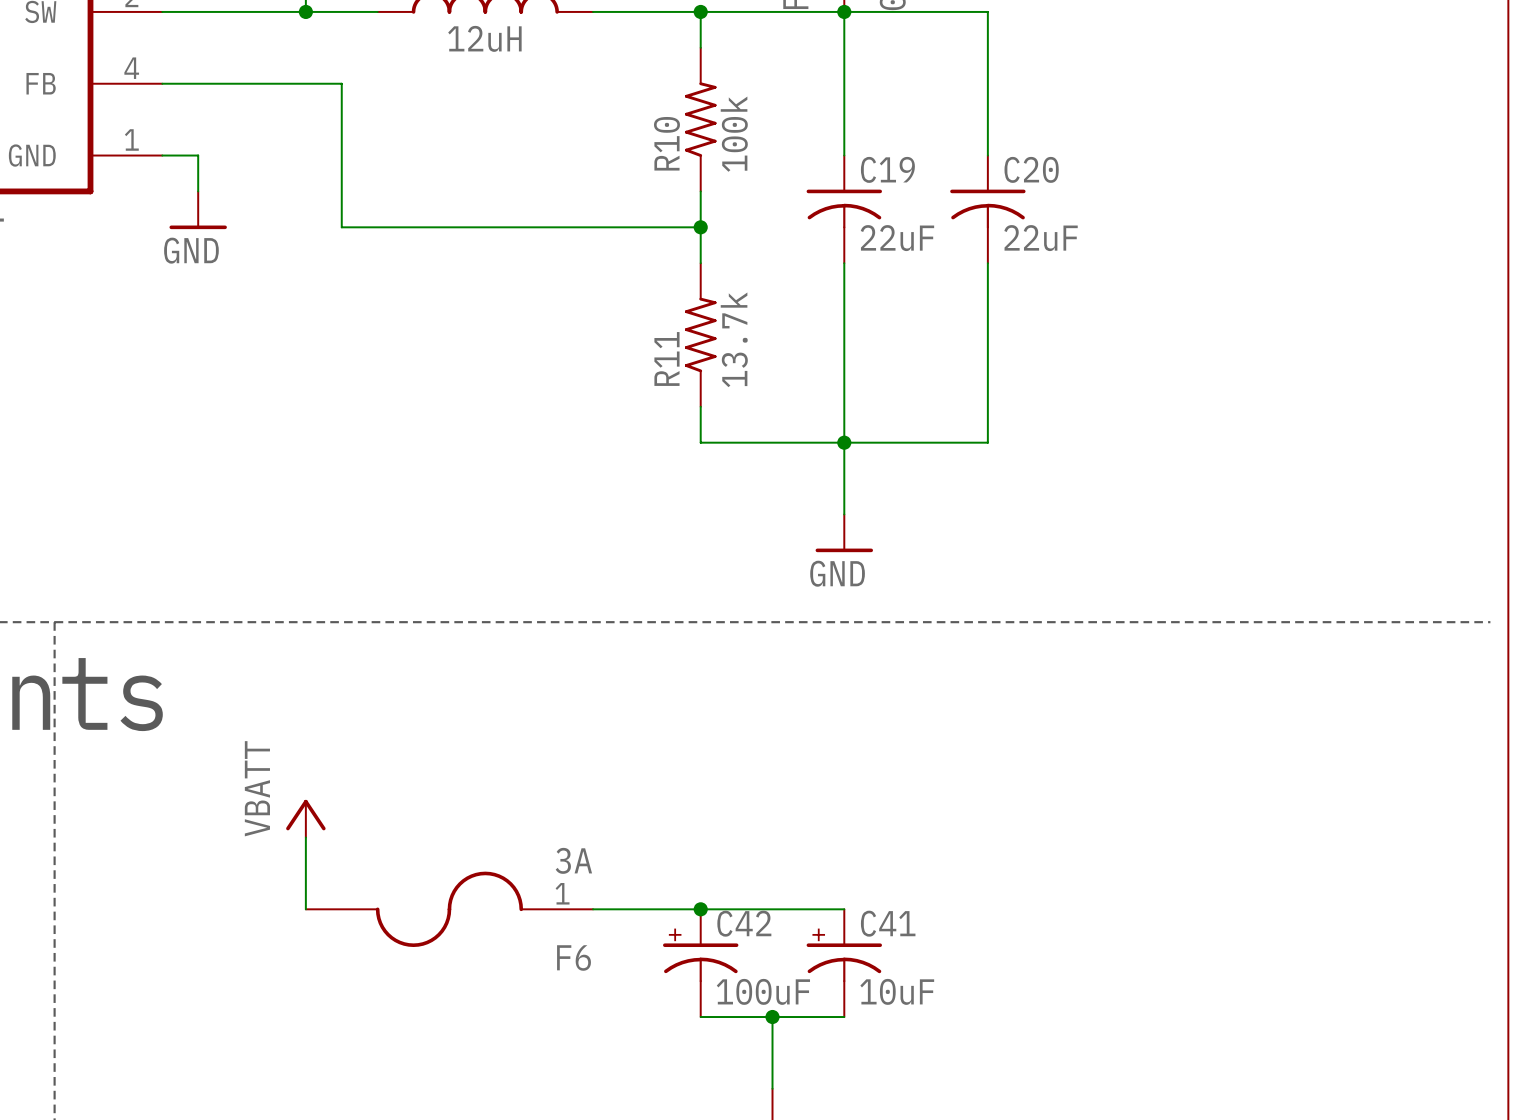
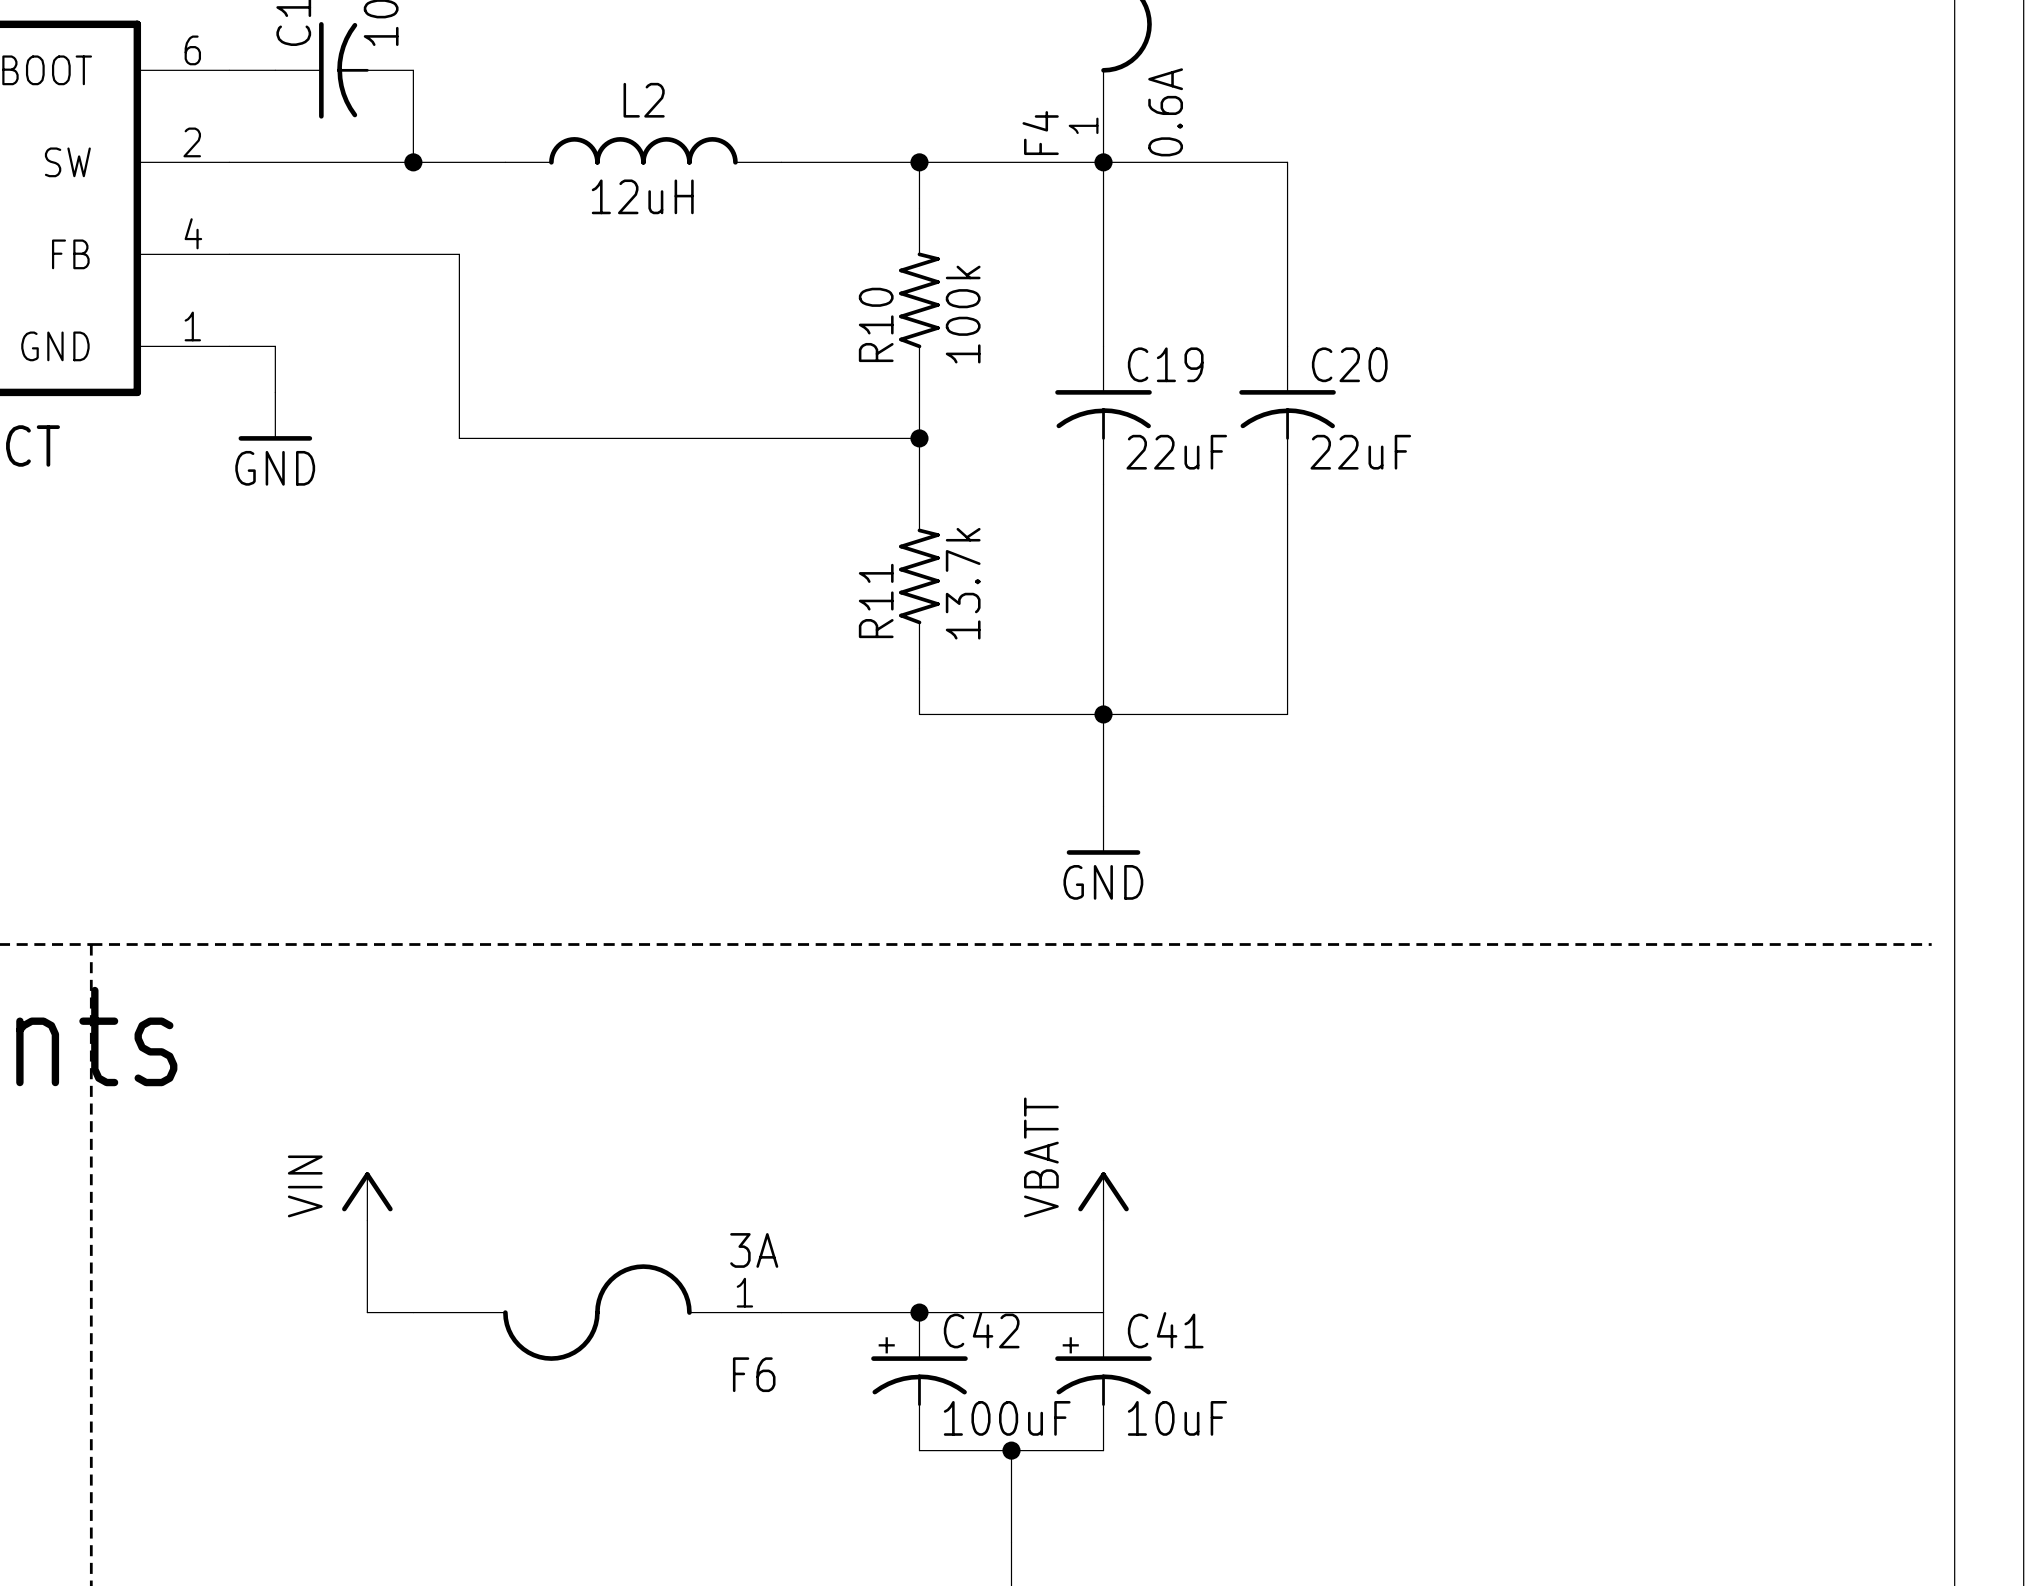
power symbol: none -> VIN (367, 1196)
power symbol: VBATT (305, 818) -> none
power symbol: none -> VBATT (1103, 1196)
wire: (305, 837) (305, 909) -> (367, 1220) (367, 1312) (413, 1312)
wire: none -> (1103, 1220) (1103, 1312)

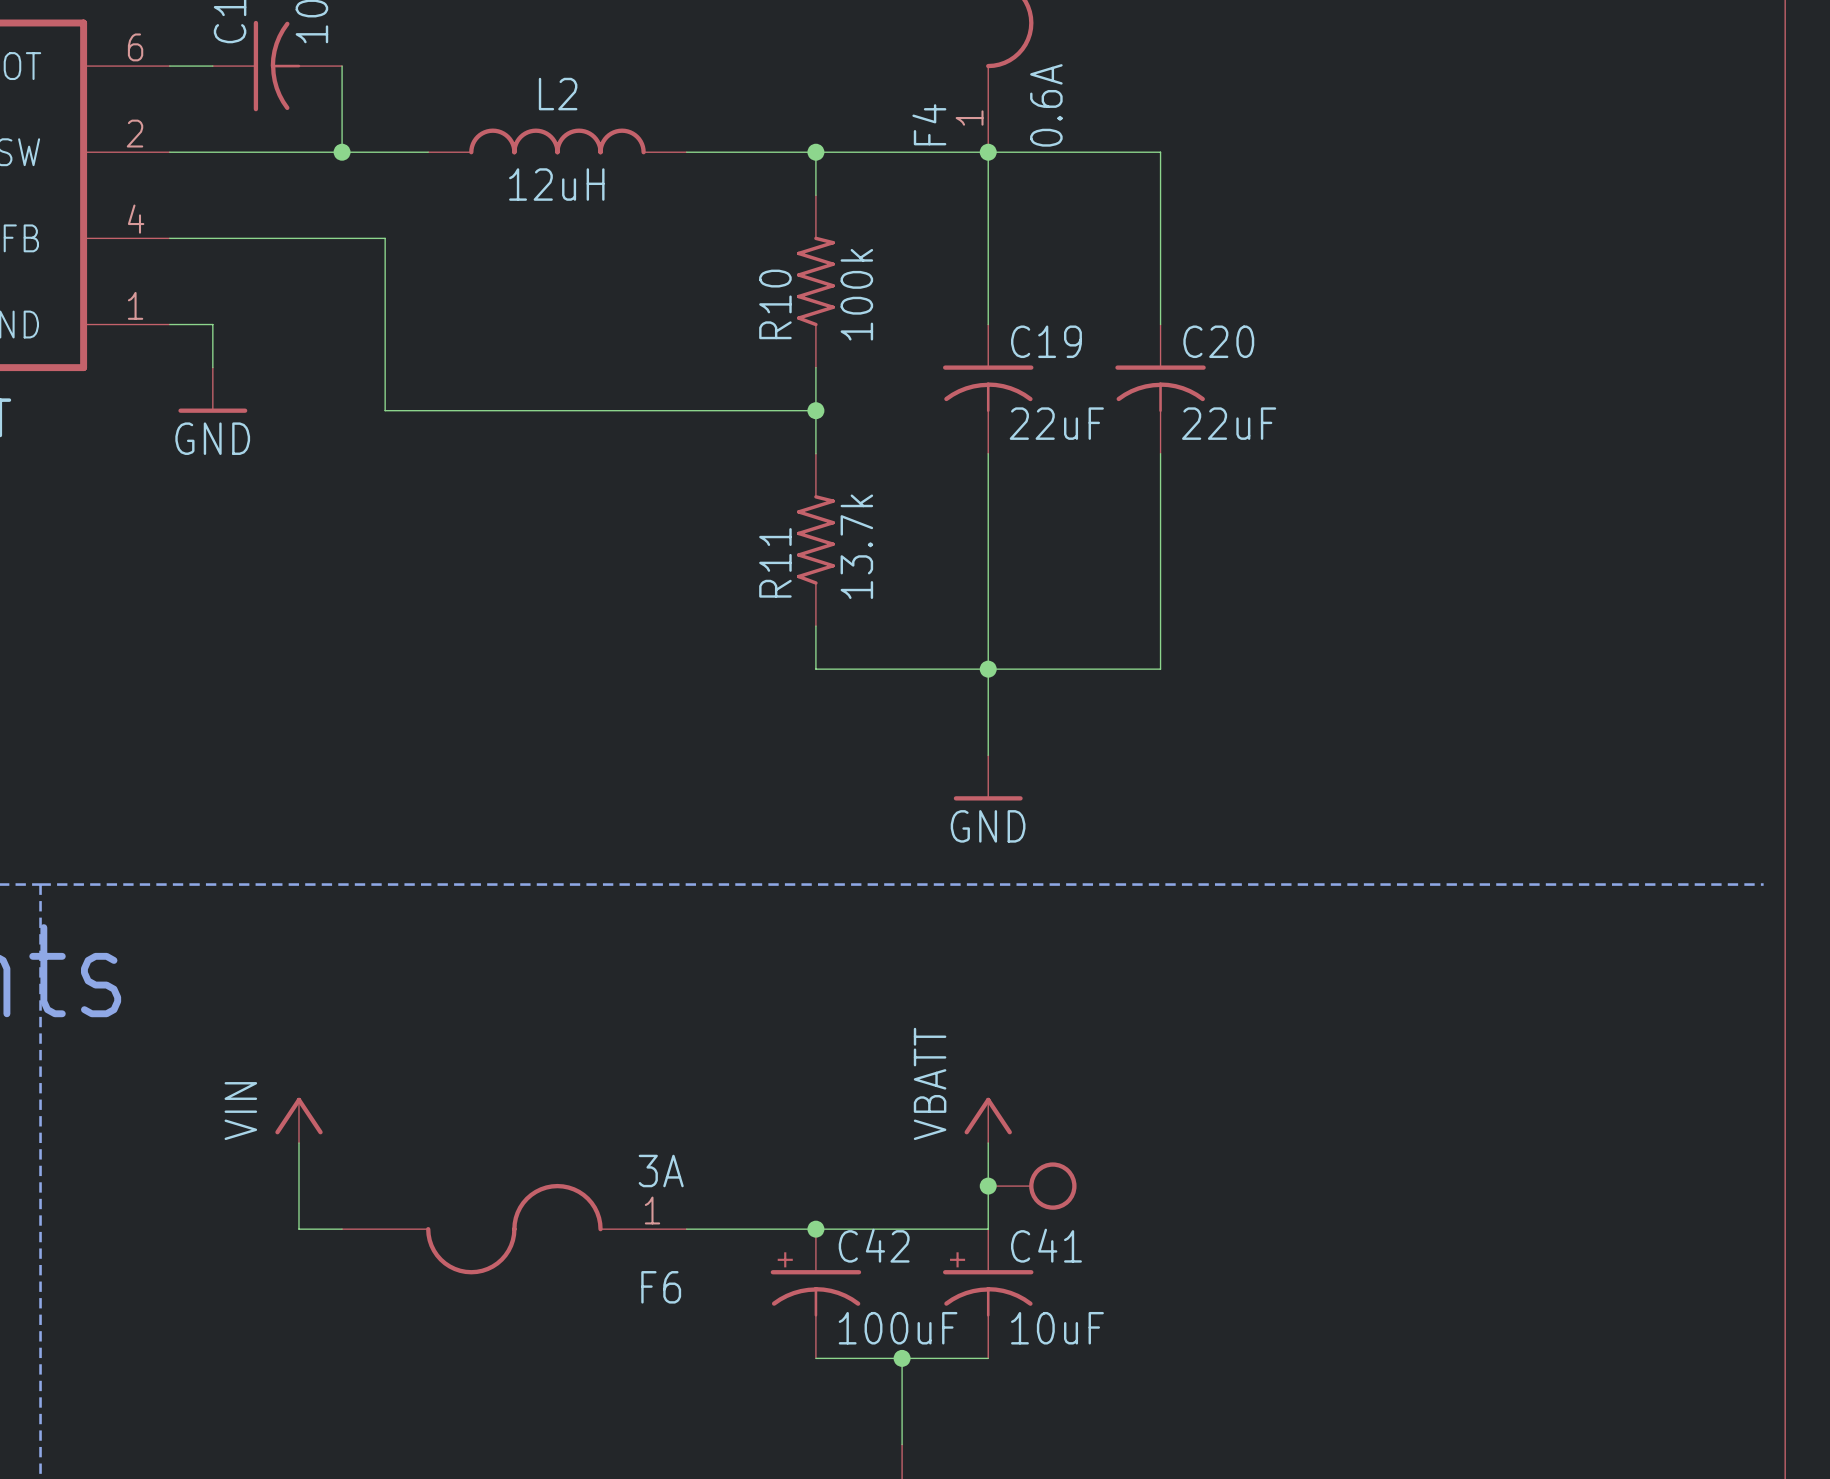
junction: none -> (988, 1186)
part: none -> (1032, 1186)

